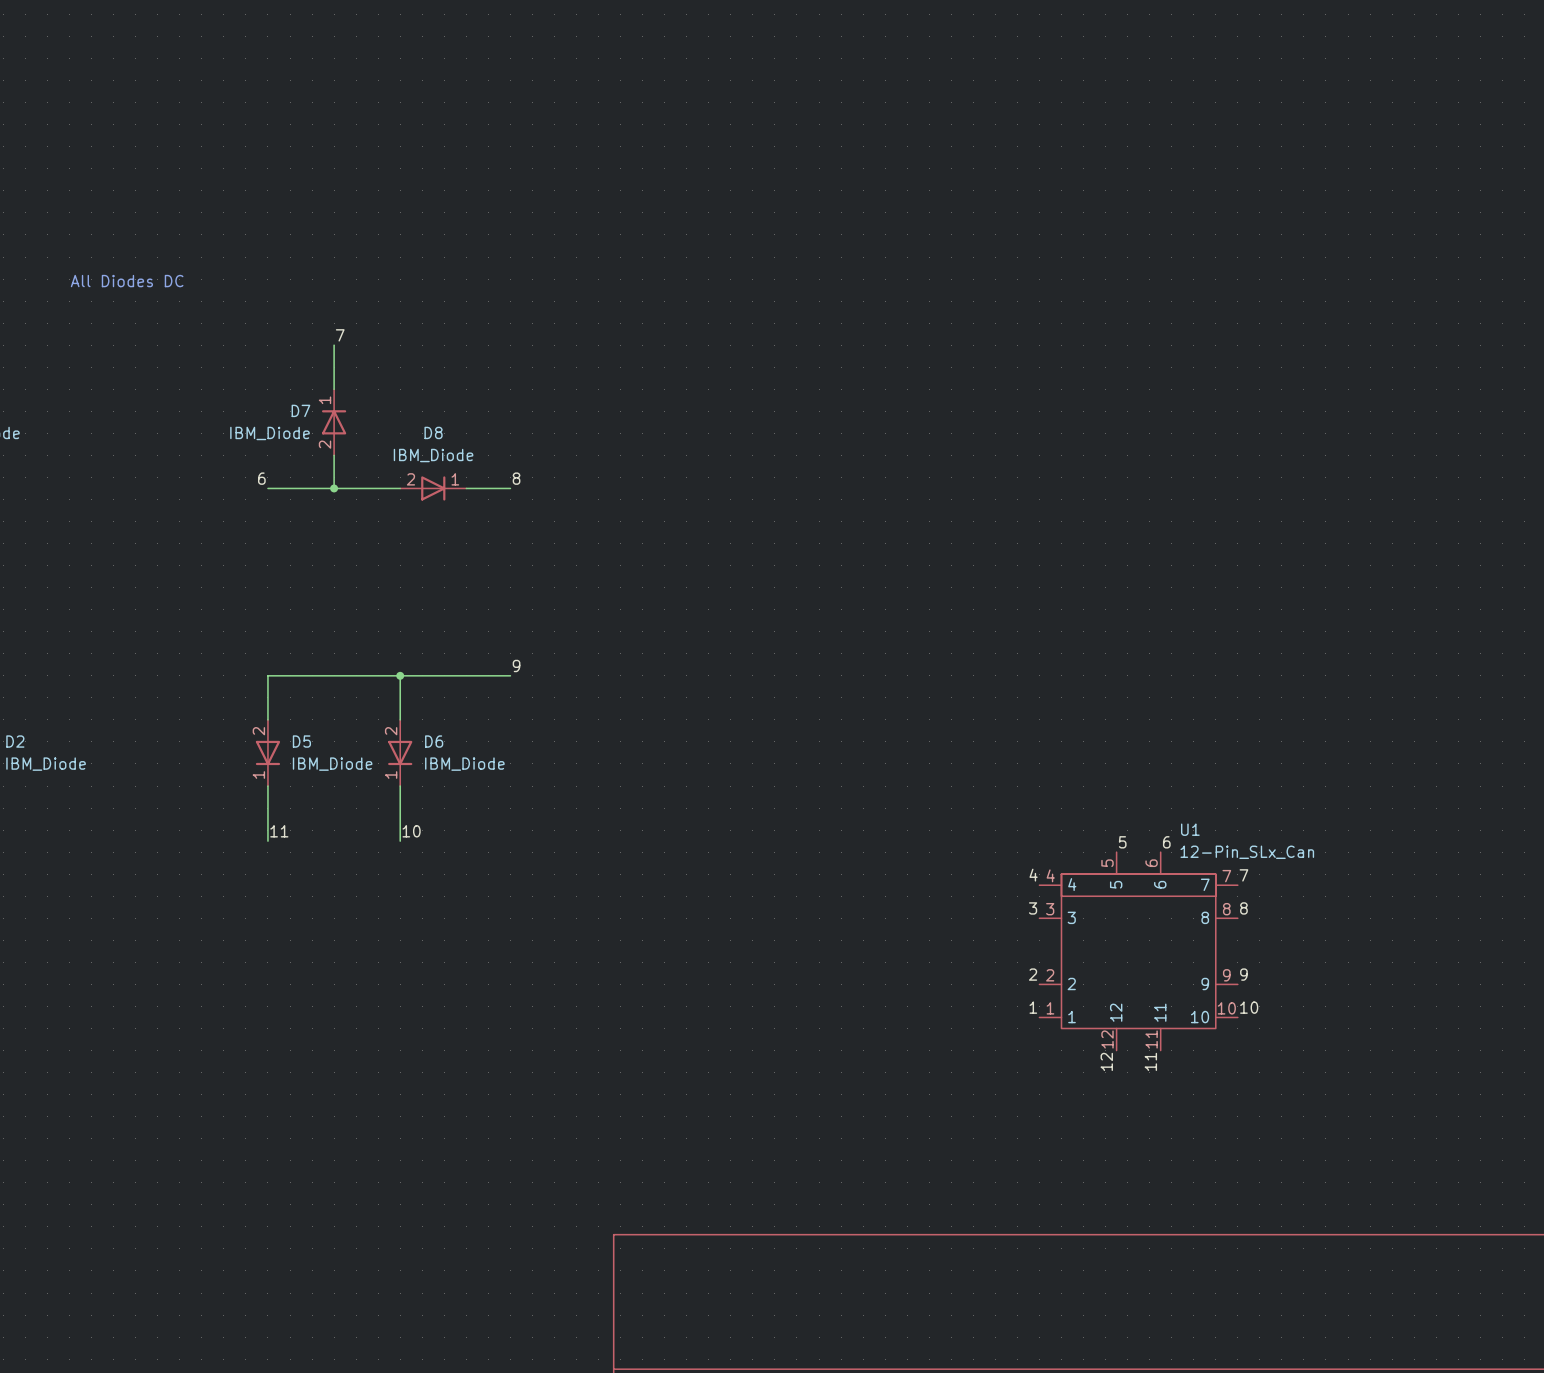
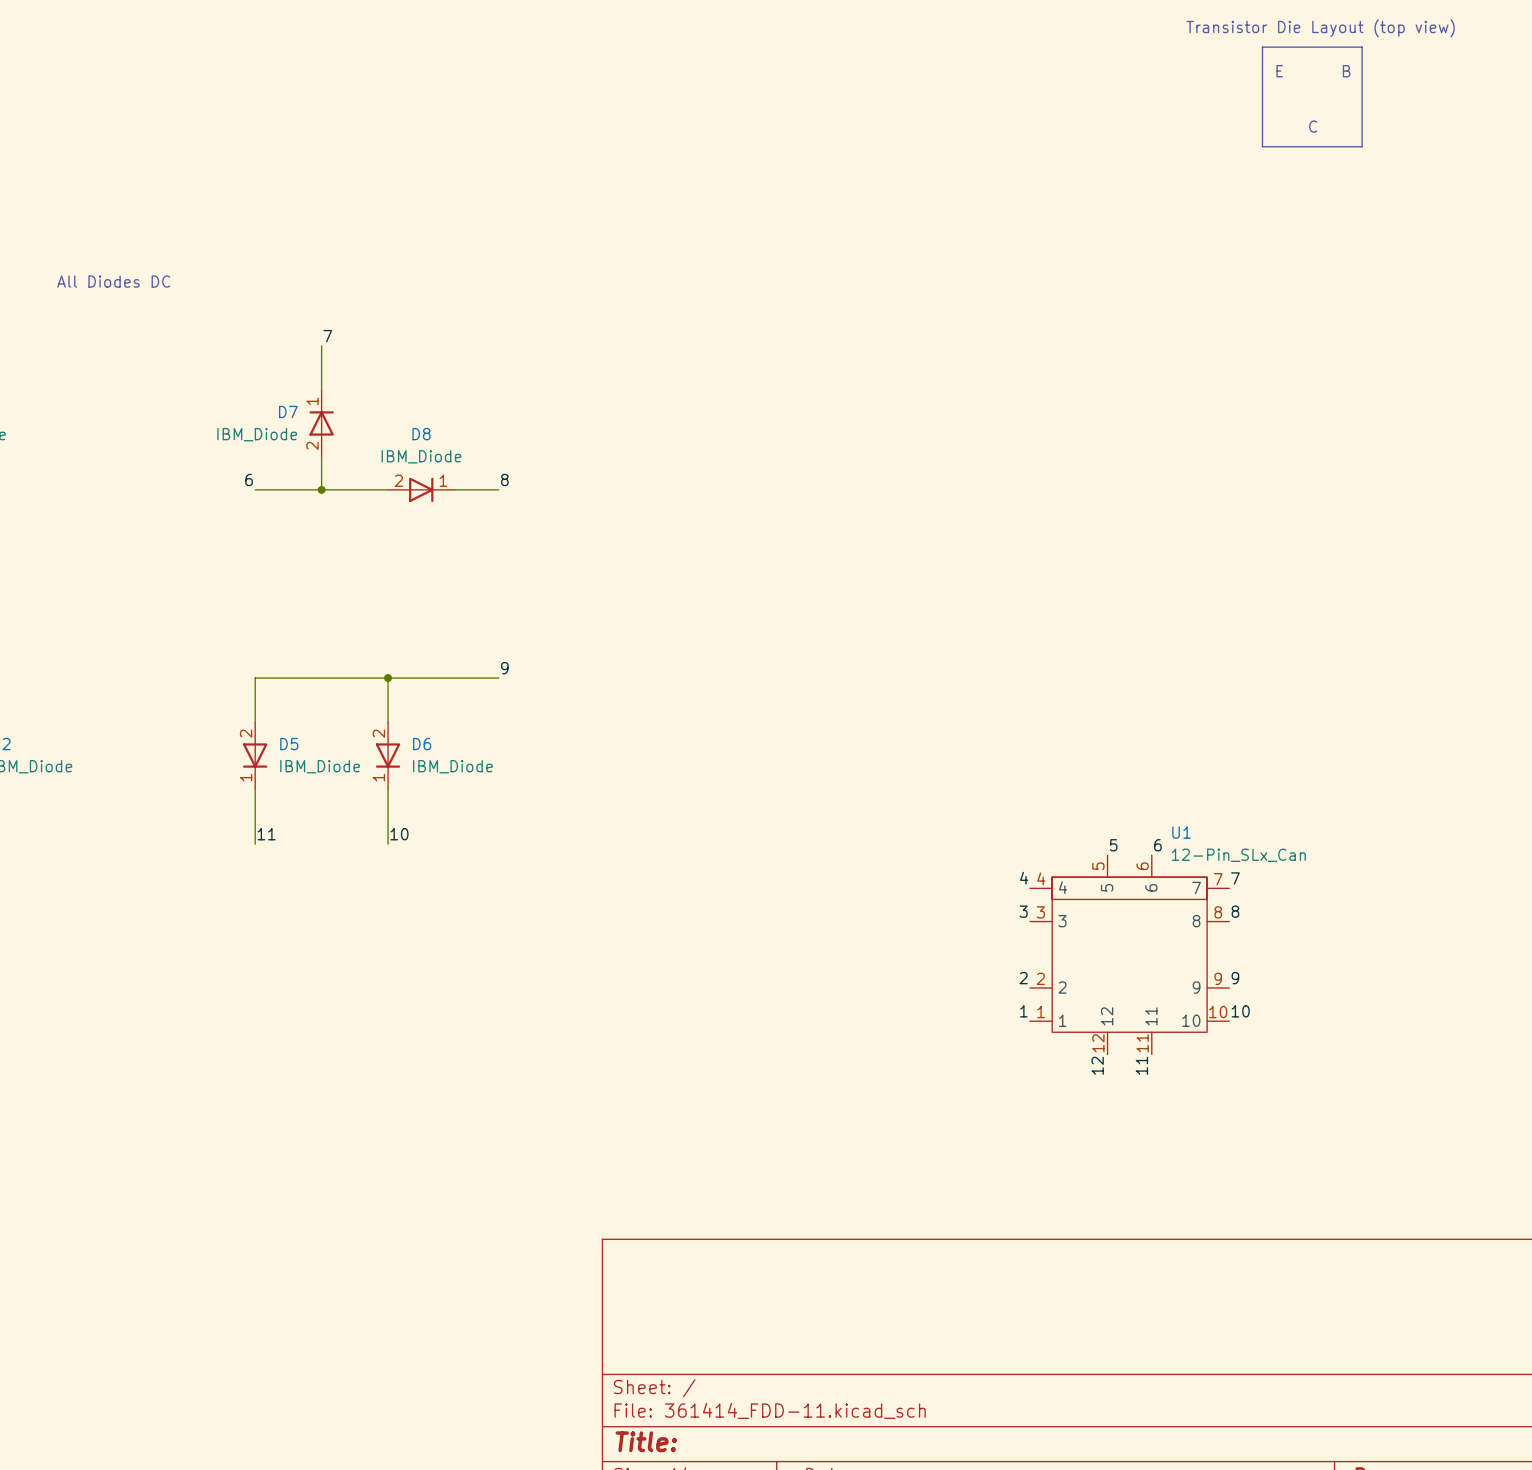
text: none -> Transistor Die Layout (top view) (1320, 28)
line: none -> (1262, 47) (1262, 146) (1362, 146) (1362, 47) (1262, 47)
text: none -> E (1279, 71)
text: none -> B (1346, 71)
text: none -> C (1313, 126)

